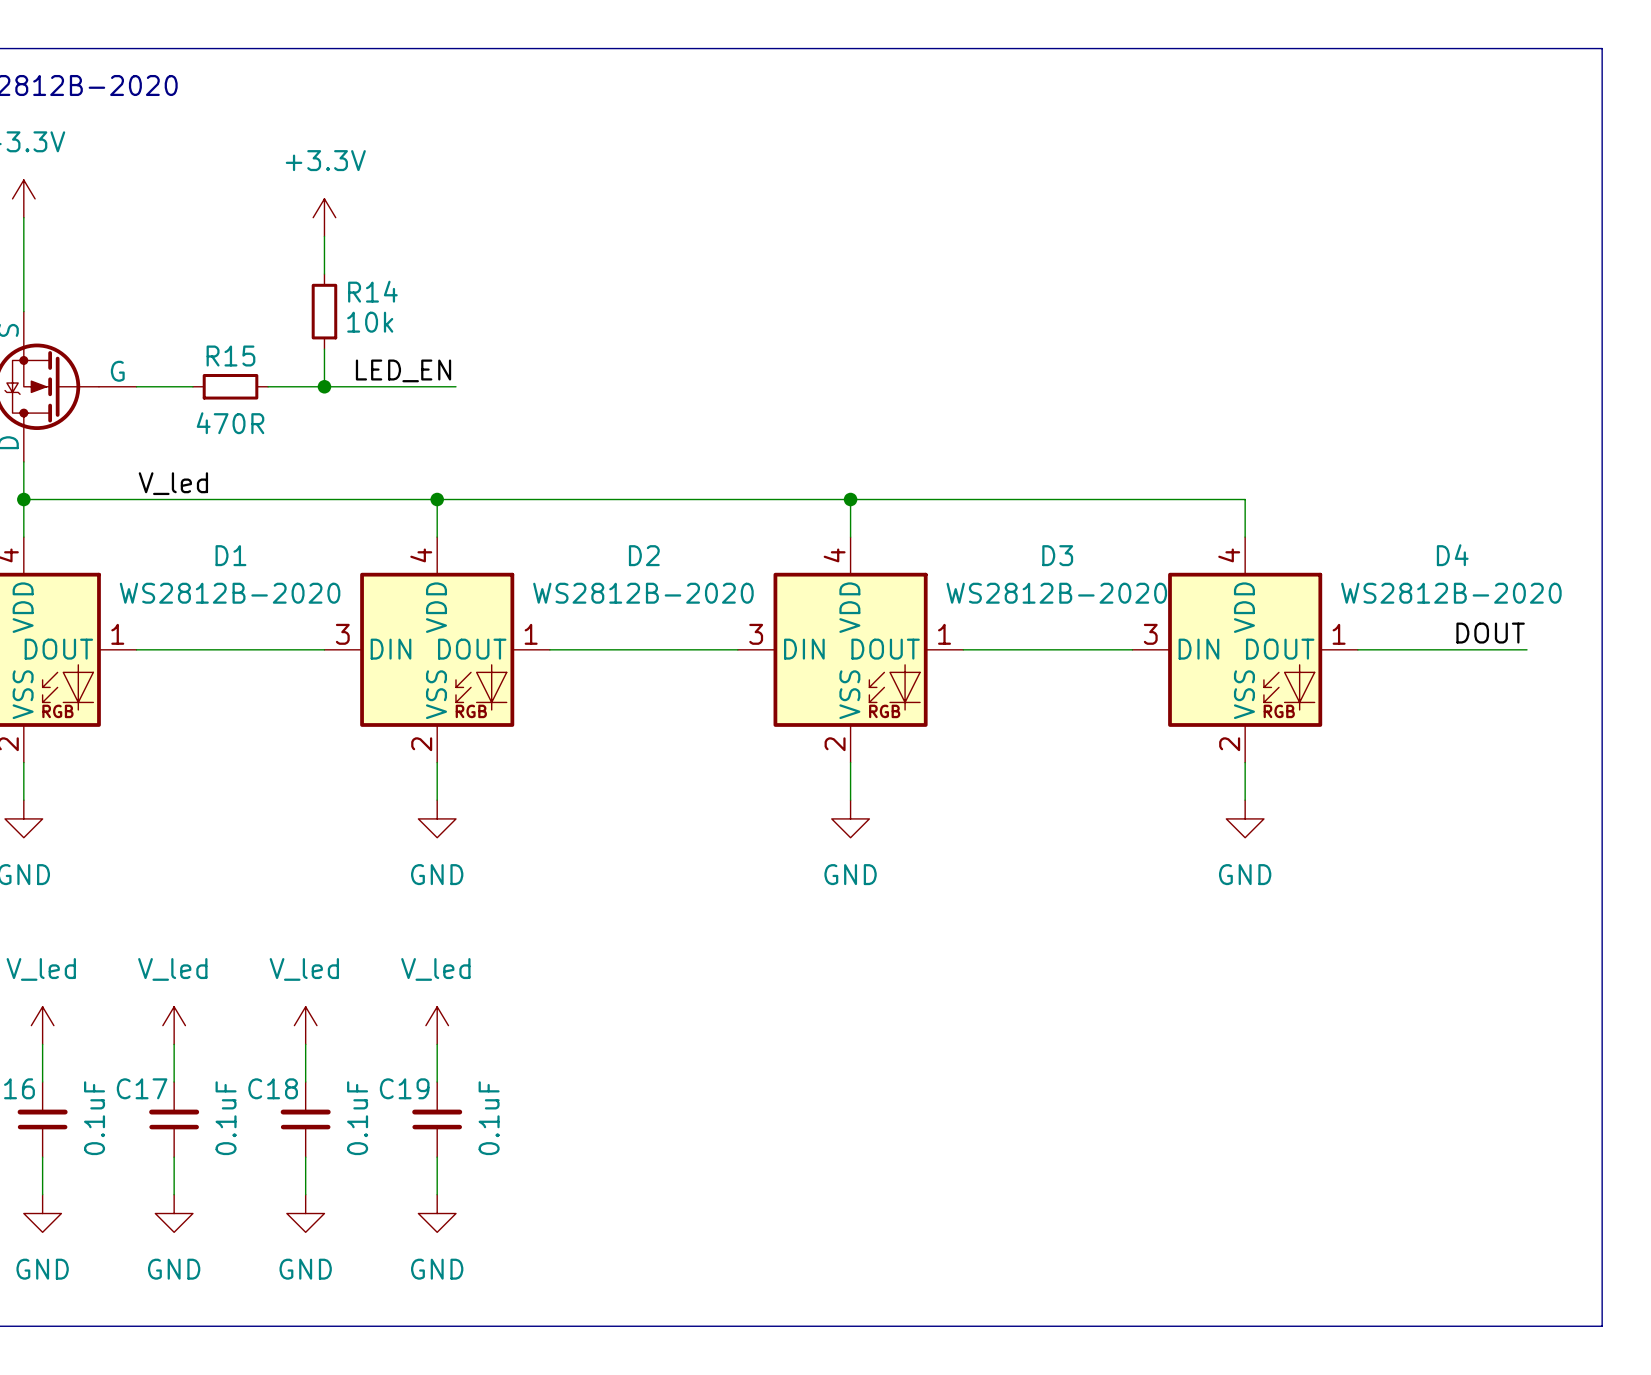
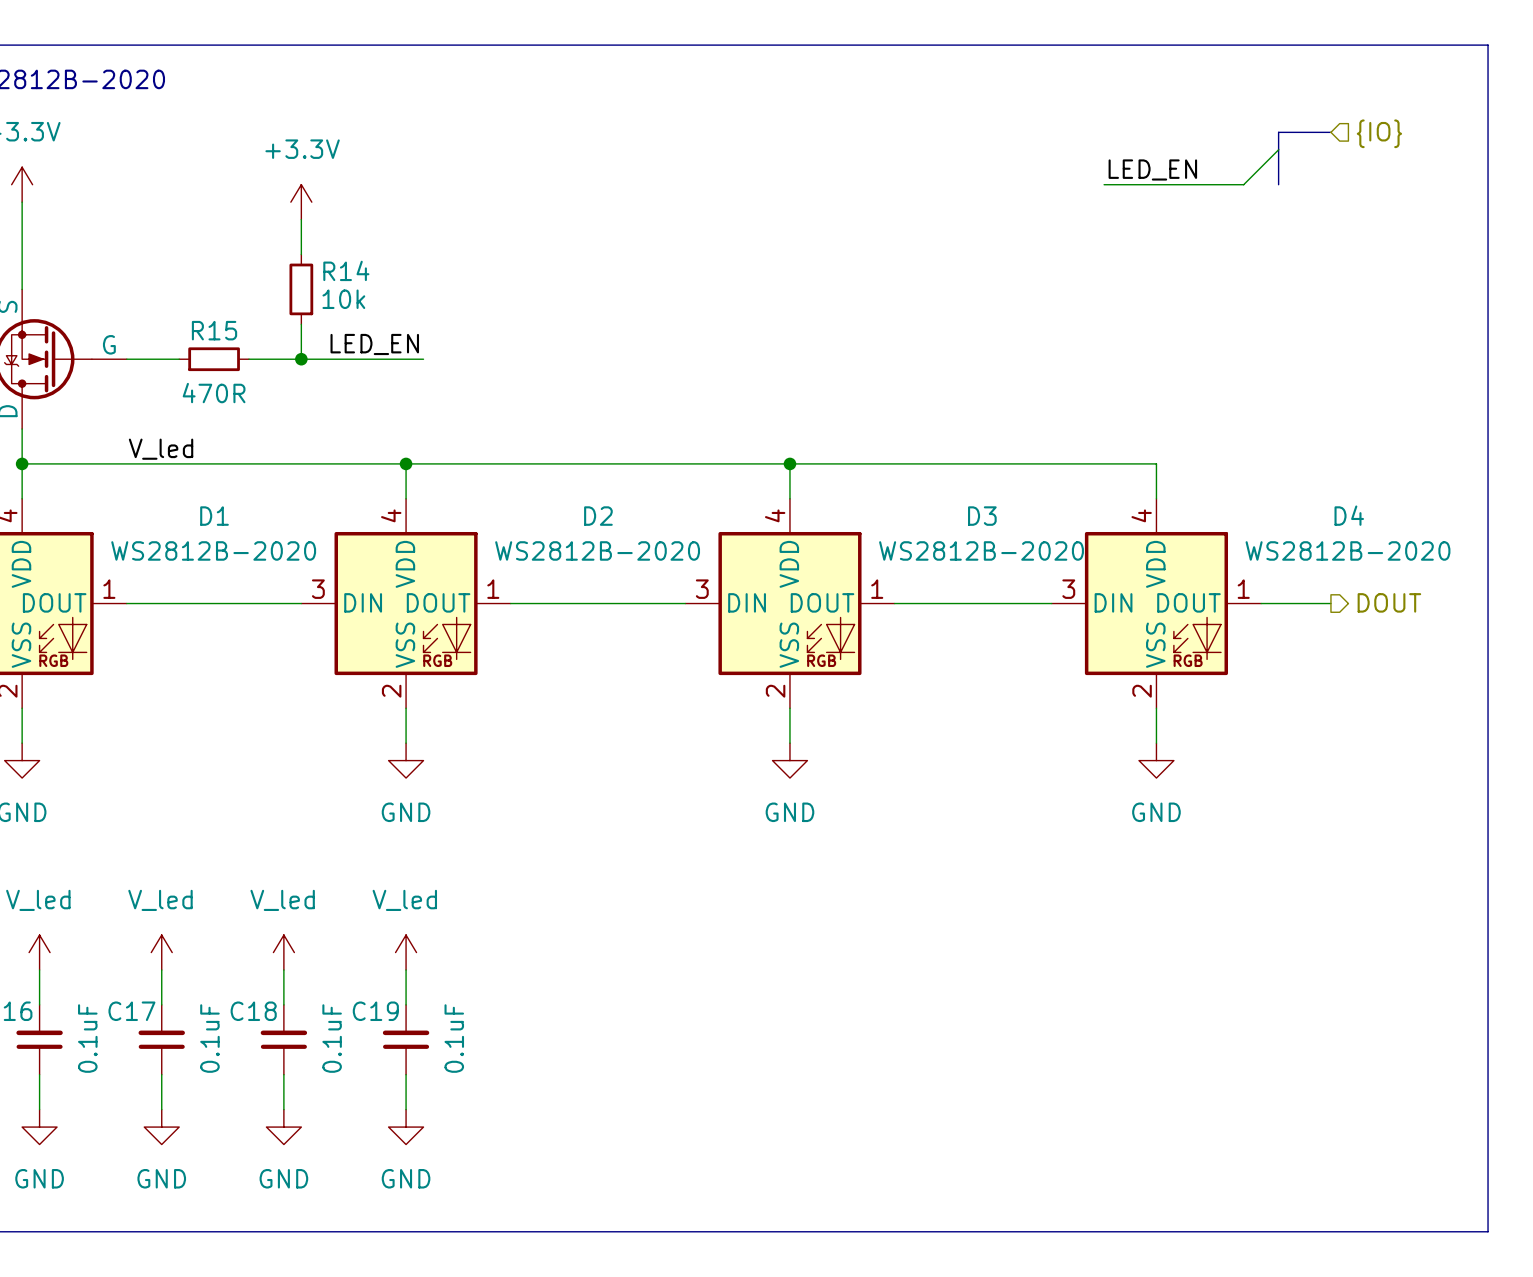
bus: none -> (1330, 132) (1278, 132) (1278, 184)
hierarchical label: none -> {IO} (1379, 133)
wire: none -> (1278, 149) (1243, 184) (1104, 184)
label: none -> LED_EN (1152, 169)
label: DOUT (1490, 633) -> none
wire: (1433, 649) (1526, 649) -> none
hierarchical label: none -> DOUT (1389, 602)

